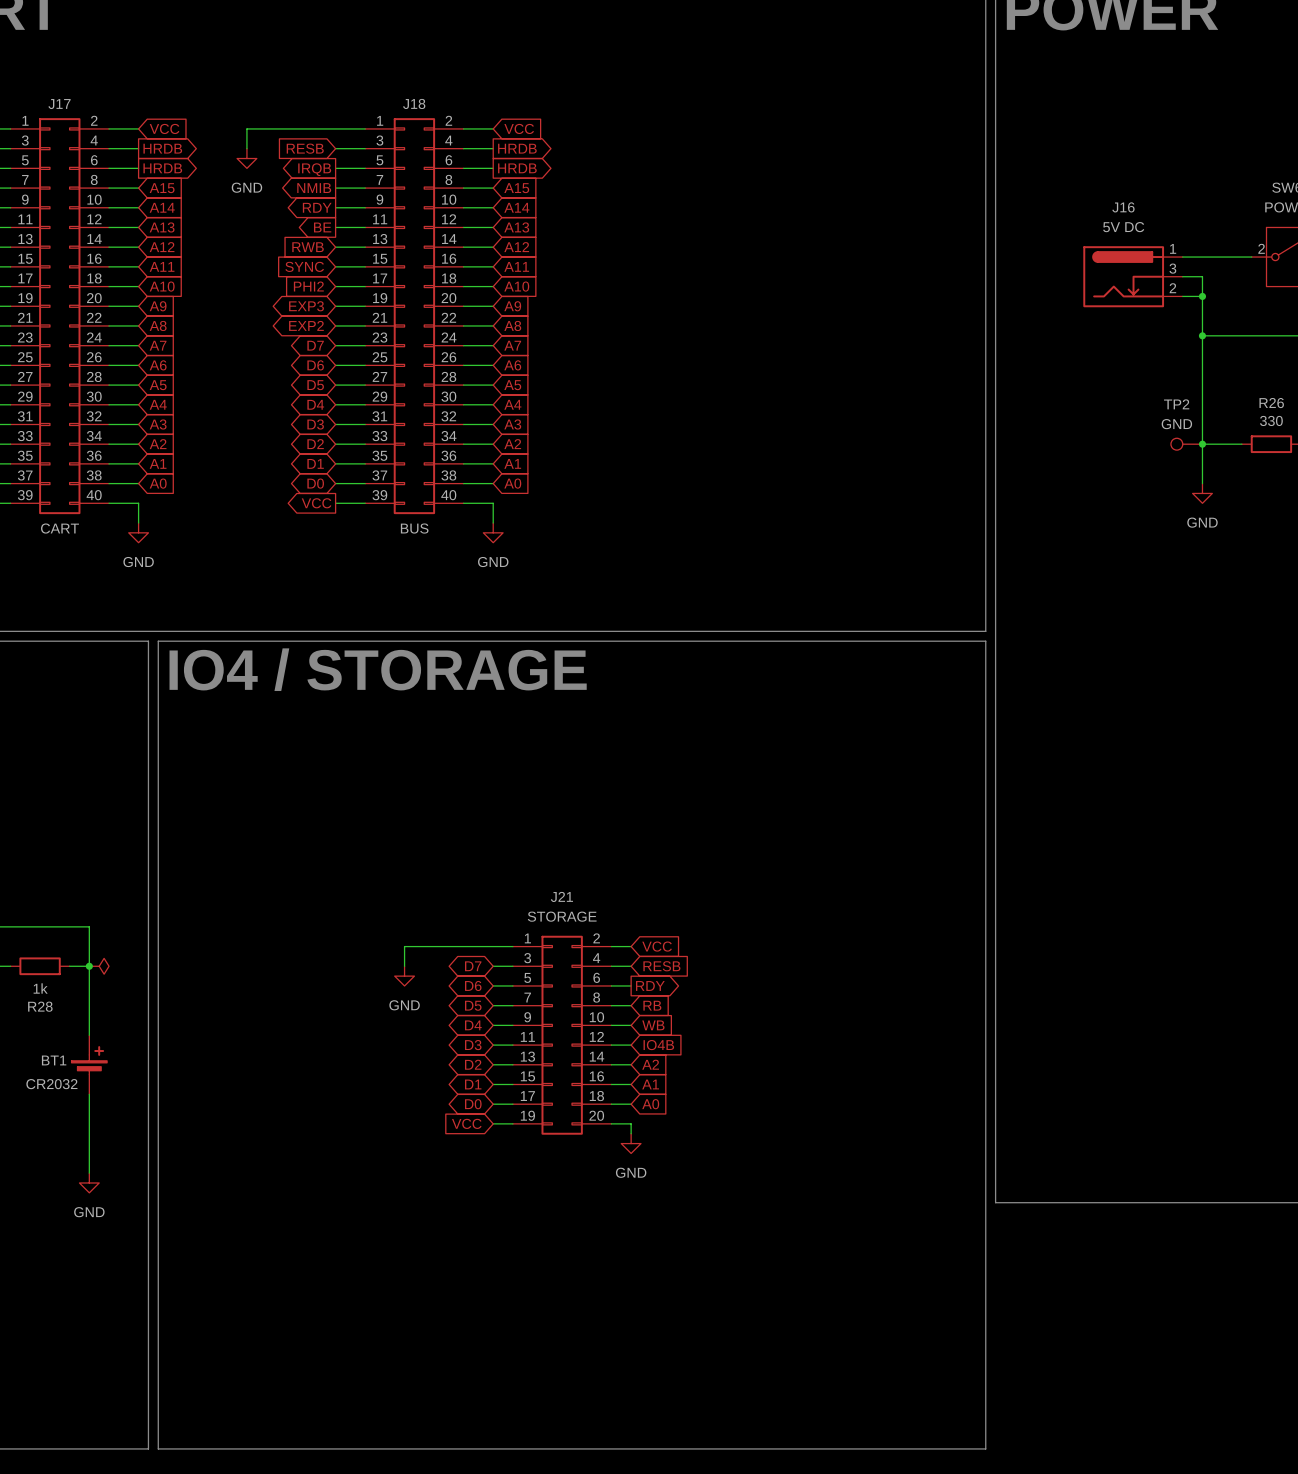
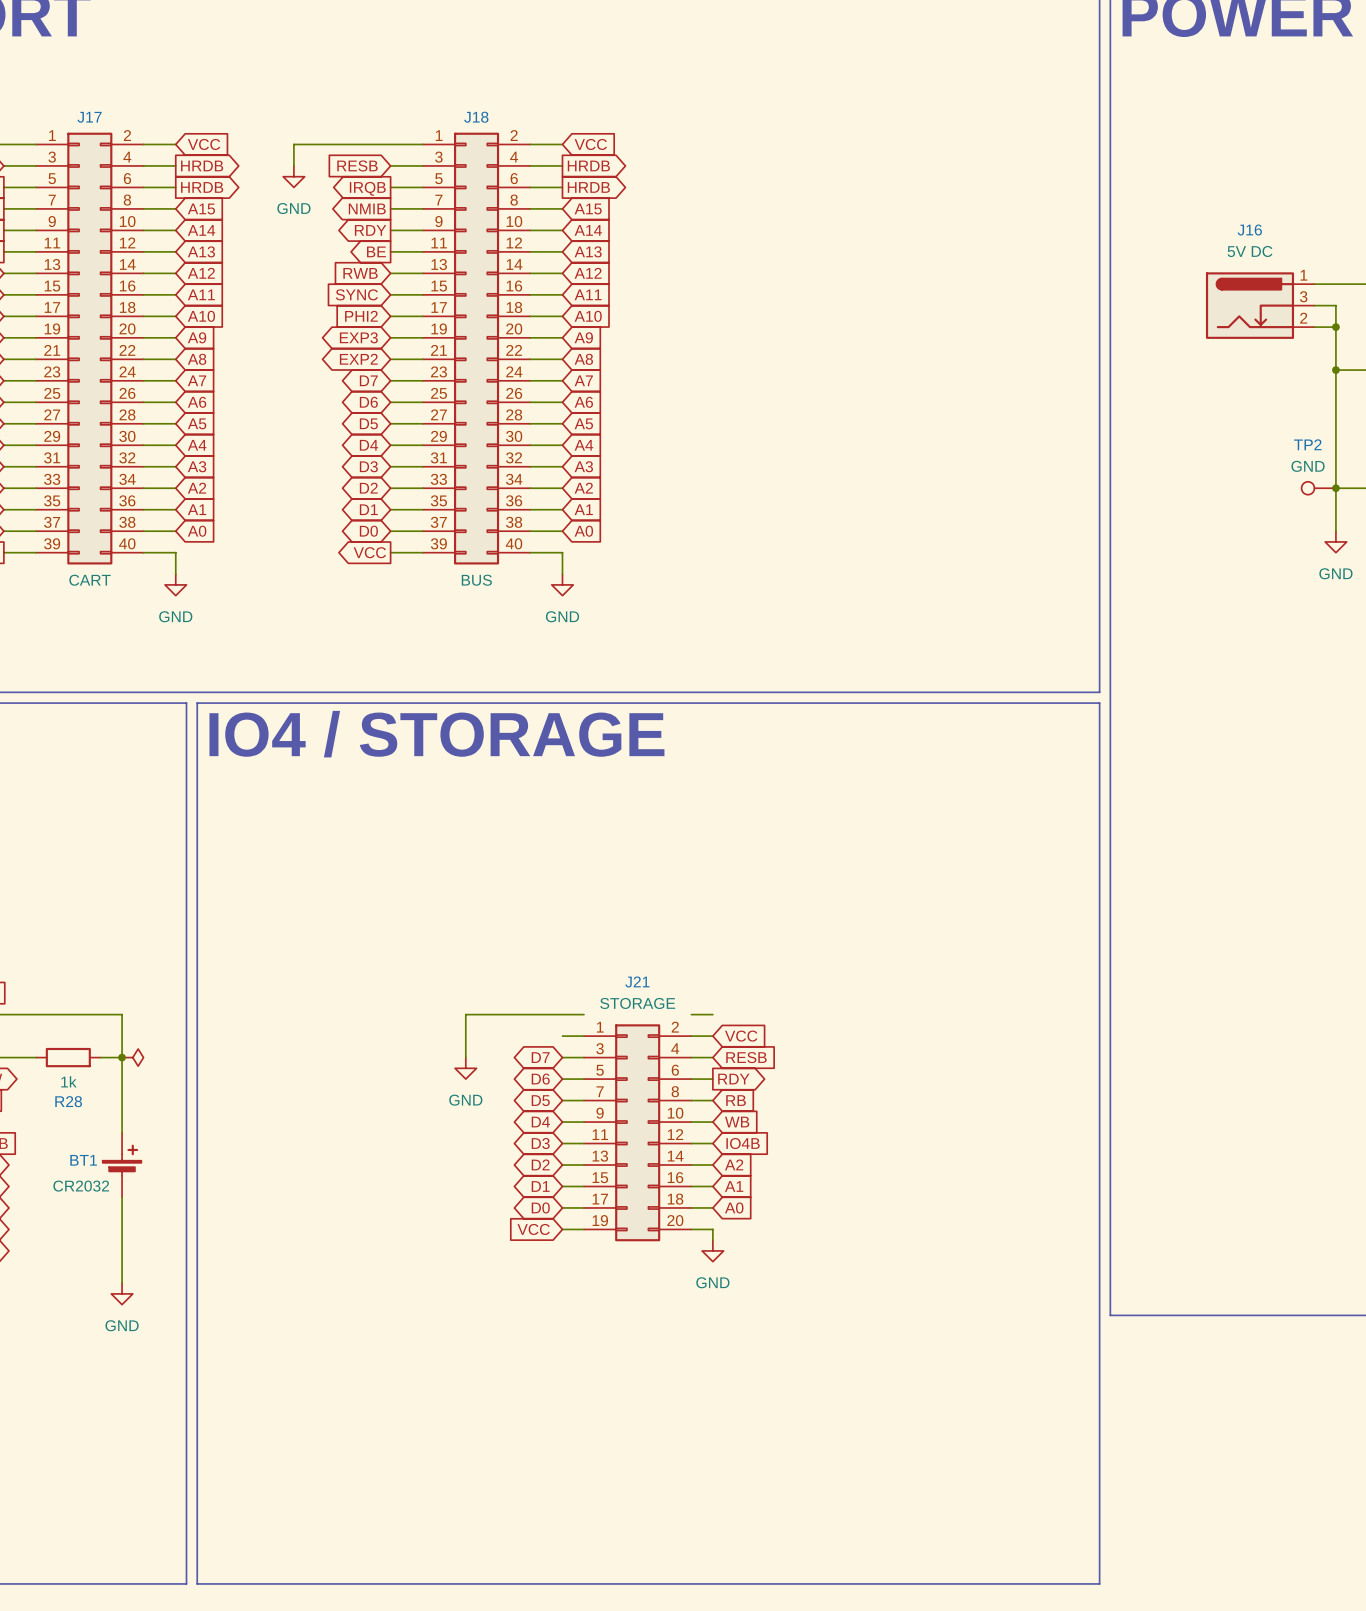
wire: none -> (691, 1014) (712, 1014)
wire: (404, 946) (493, 946) -> (465, 1036) (465, 1014) (583, 1014)

